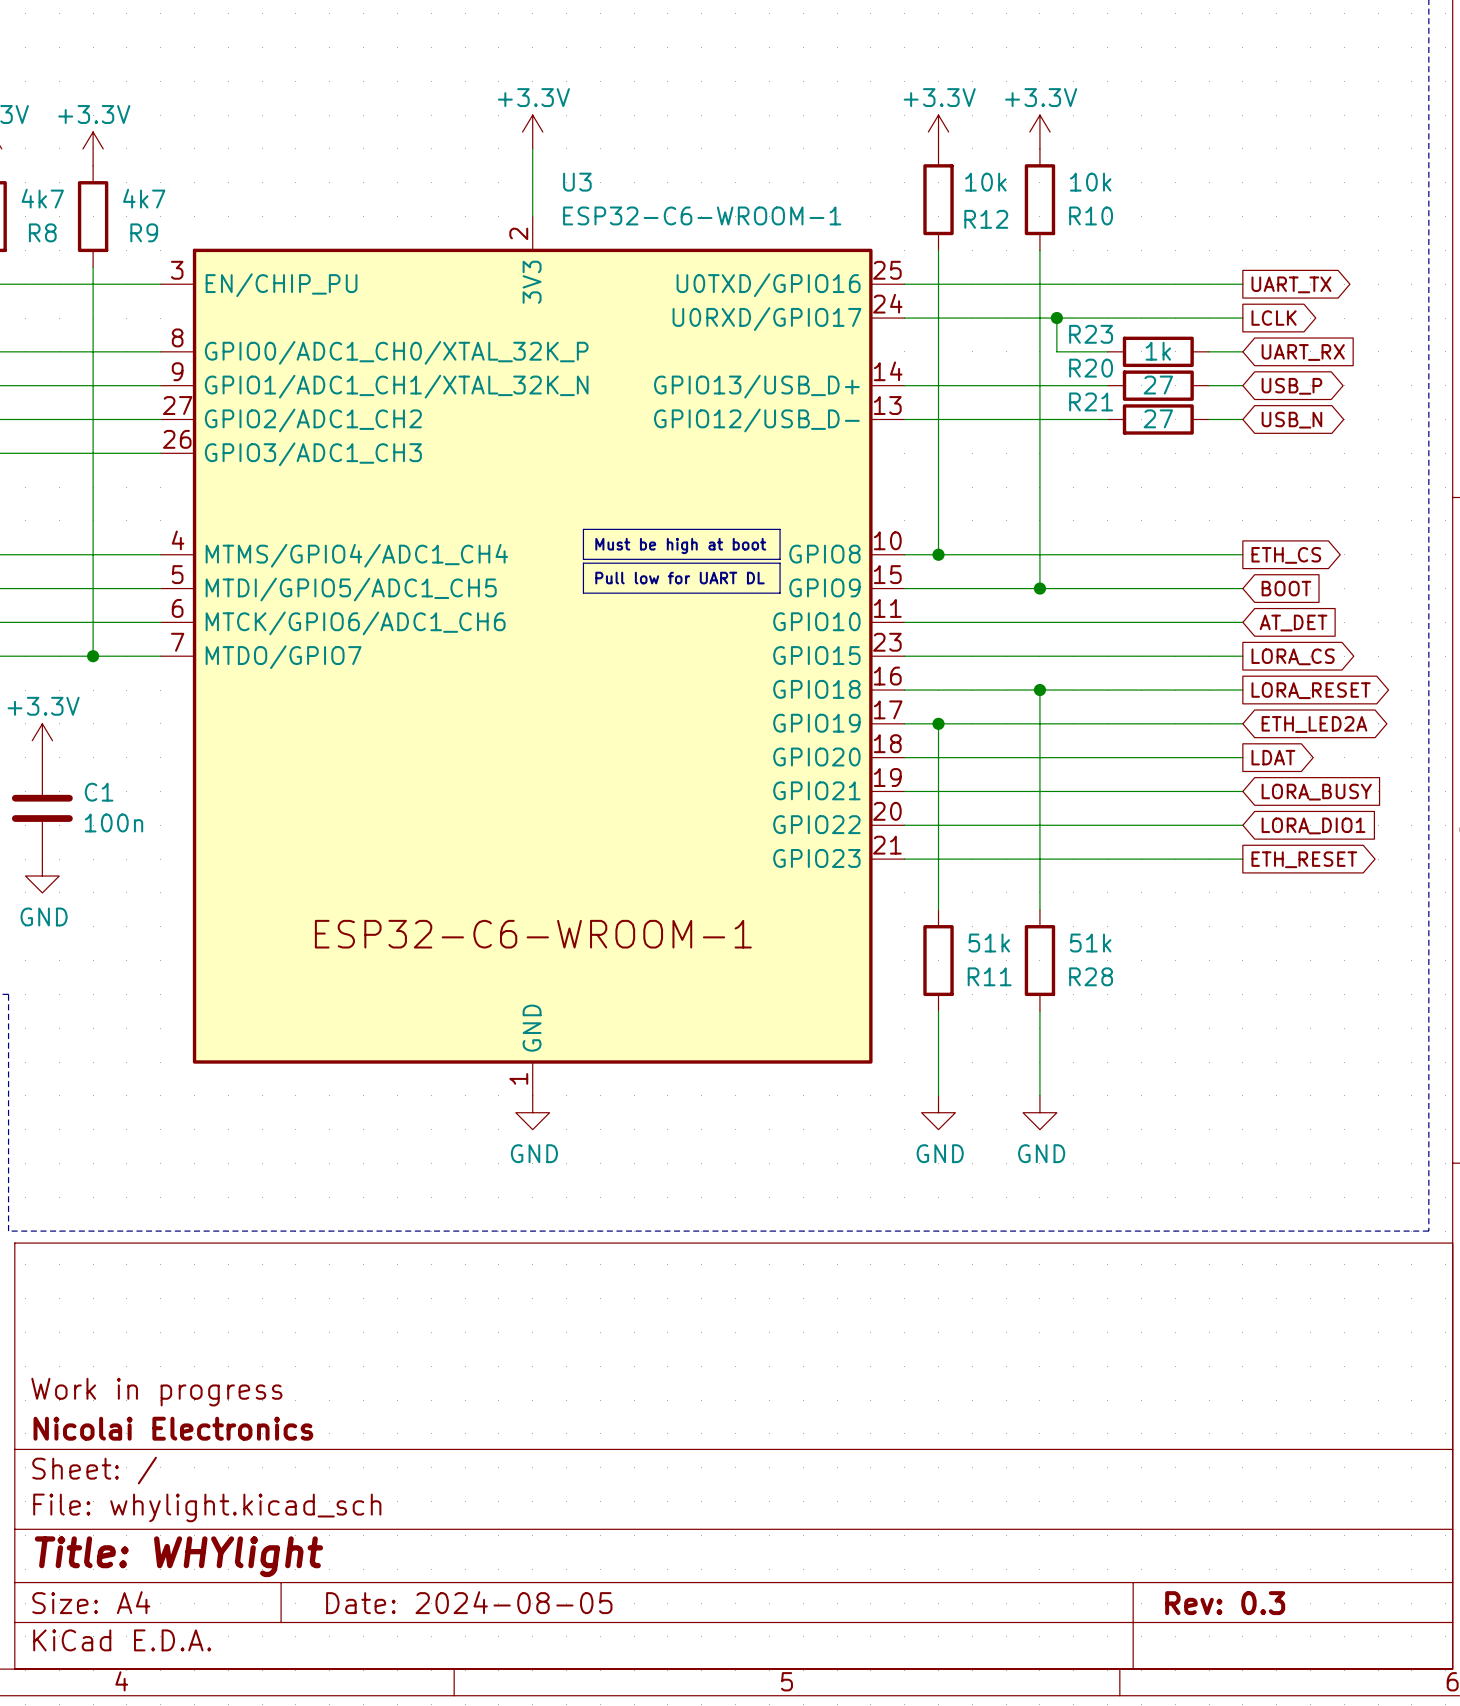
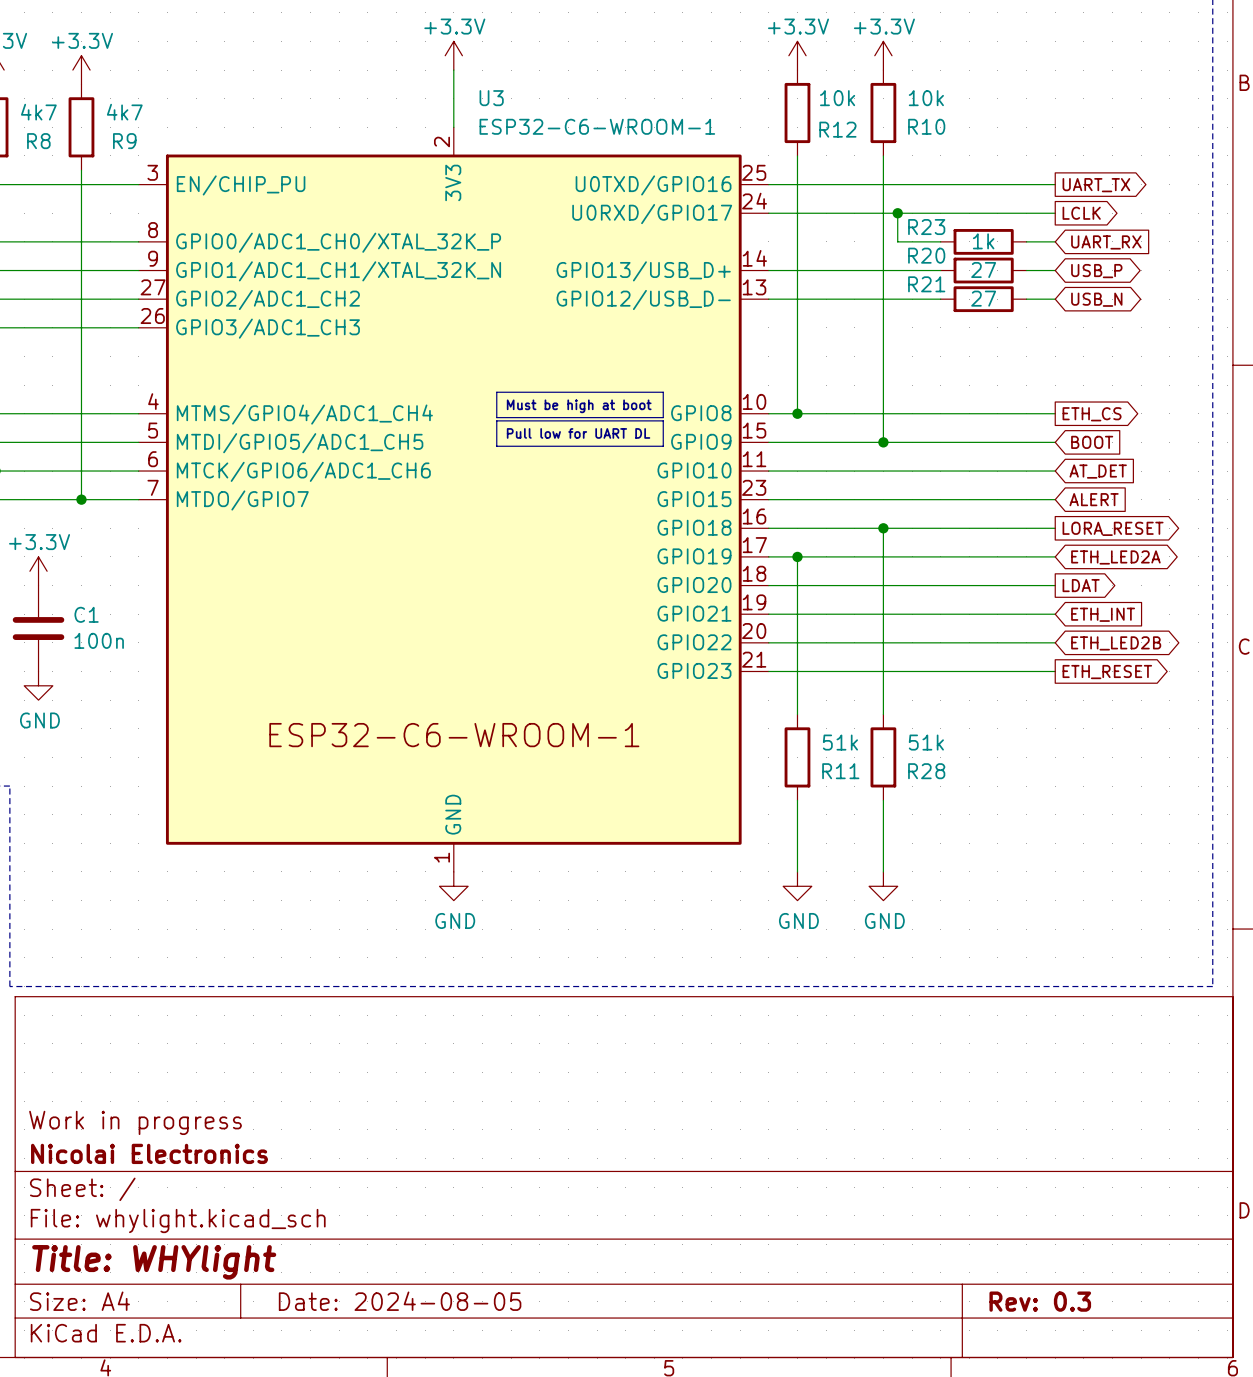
global label shape: output (1293, 656) -> input (1094, 499)
global label: LORA_CS (1293, 656) -> ALERT (1094, 499)
global label: LORA_BUSY (1316, 792) -> ETH_INT (1103, 614)
global label shape: input (1313, 825) -> bidirectional (1116, 643)
global label: LORA_DIO1 (1313, 825) -> ETH_LED2B (1116, 643)

